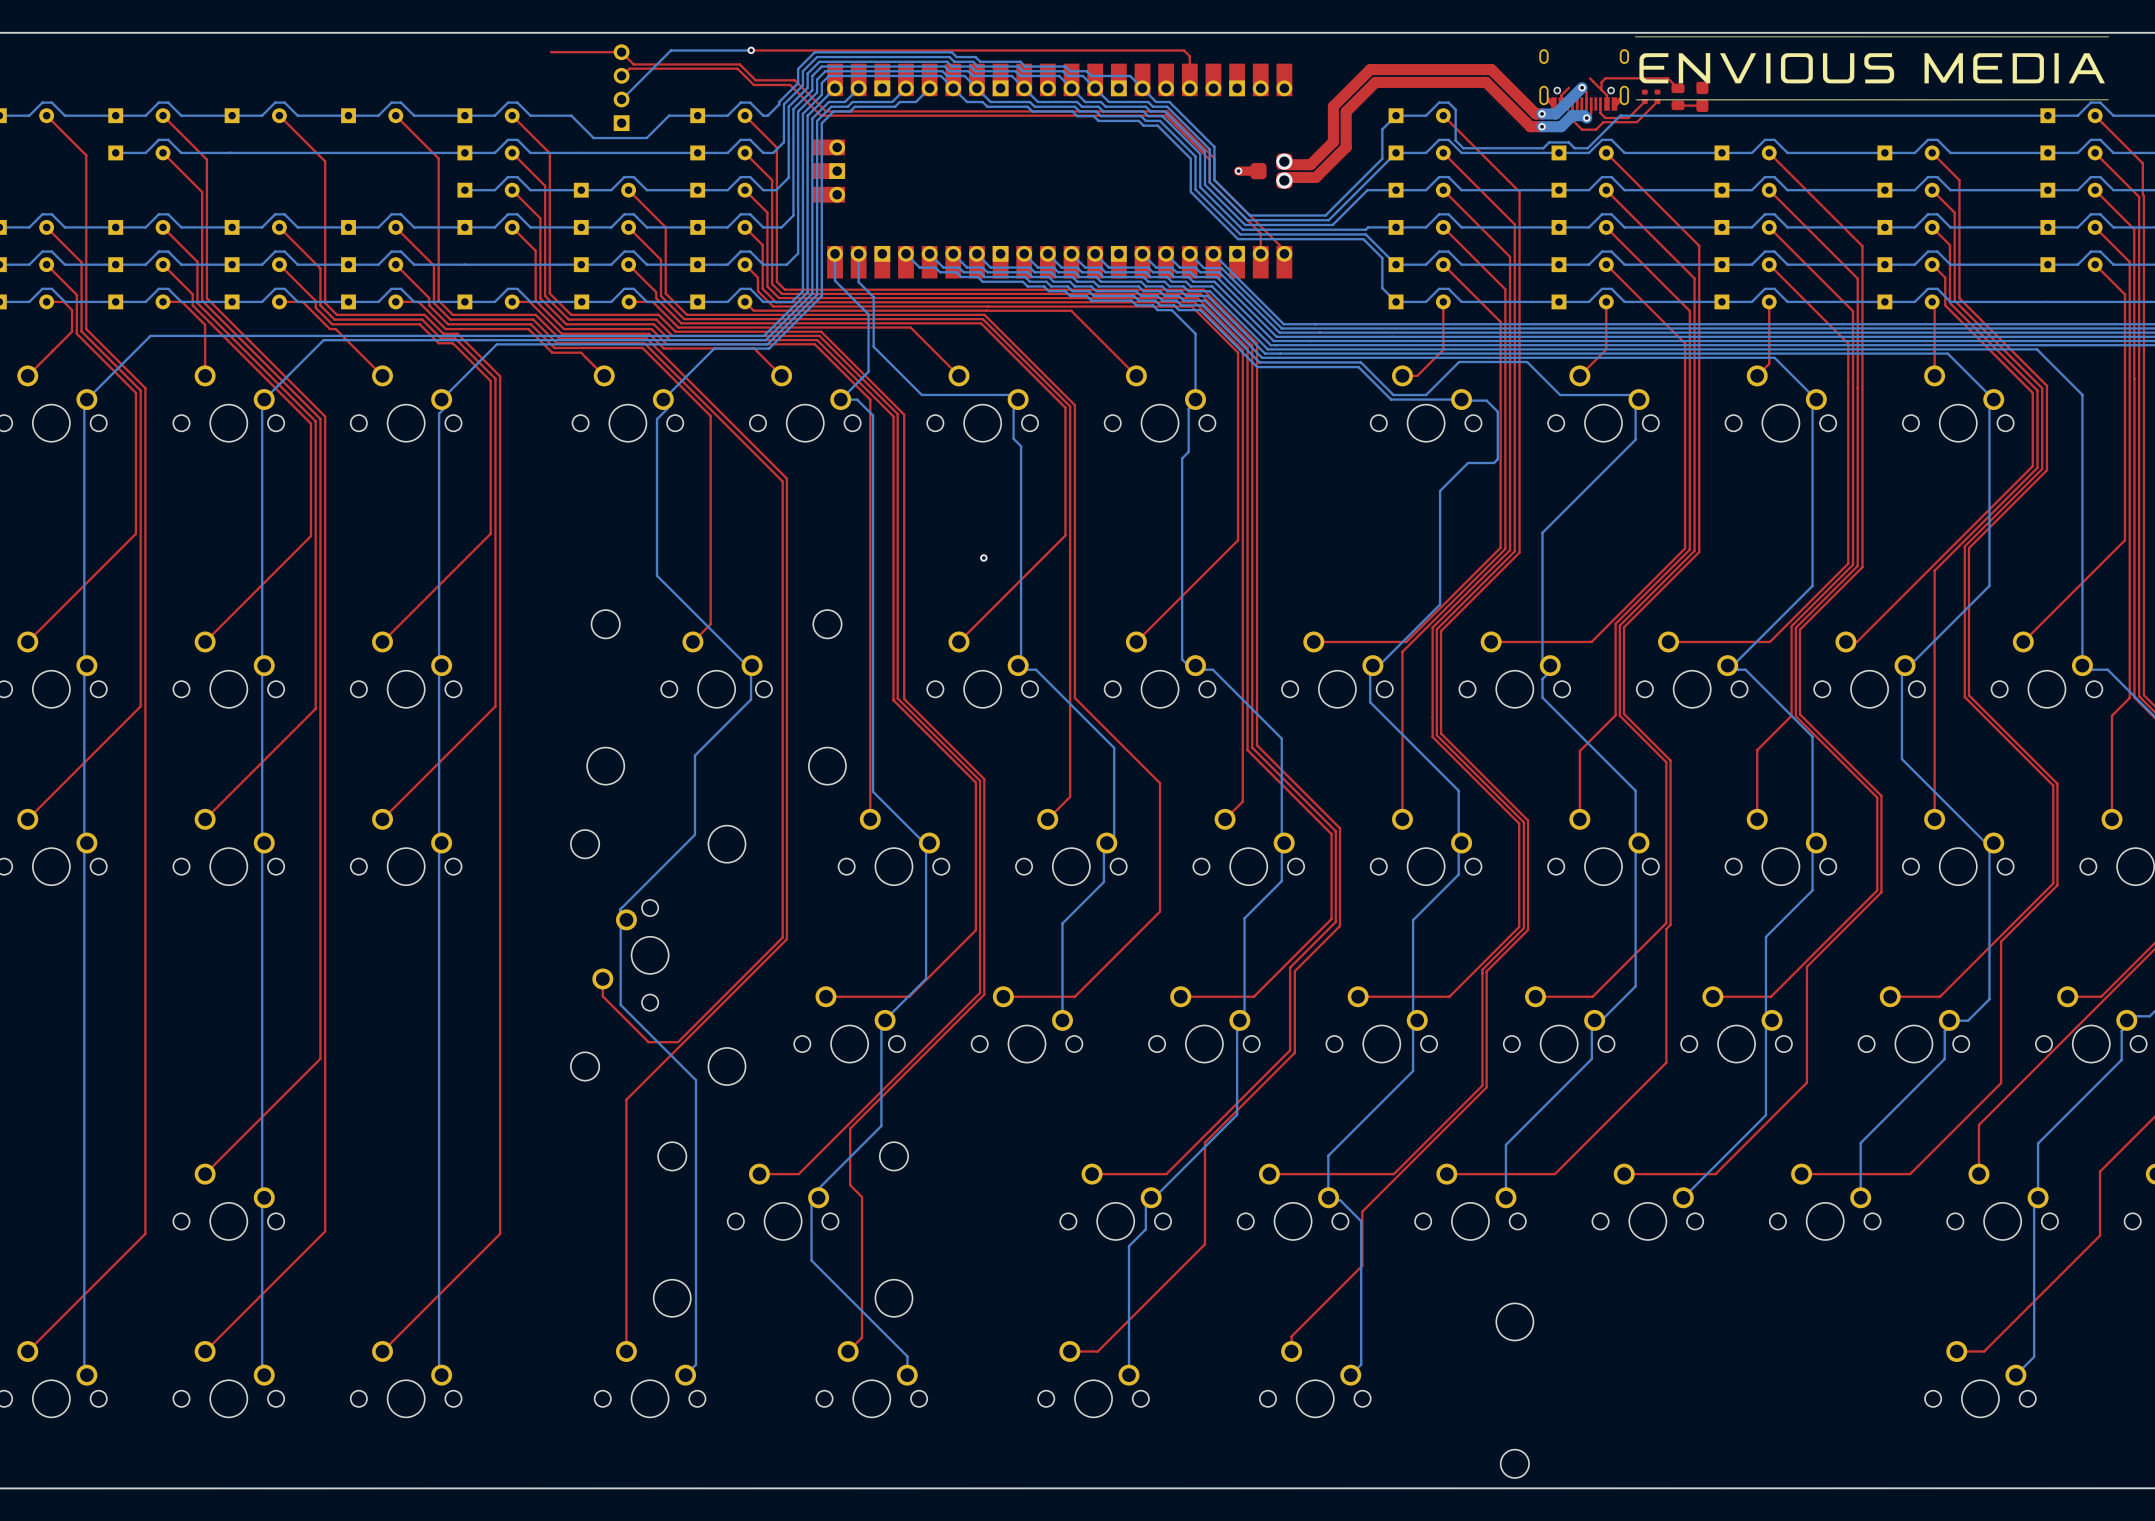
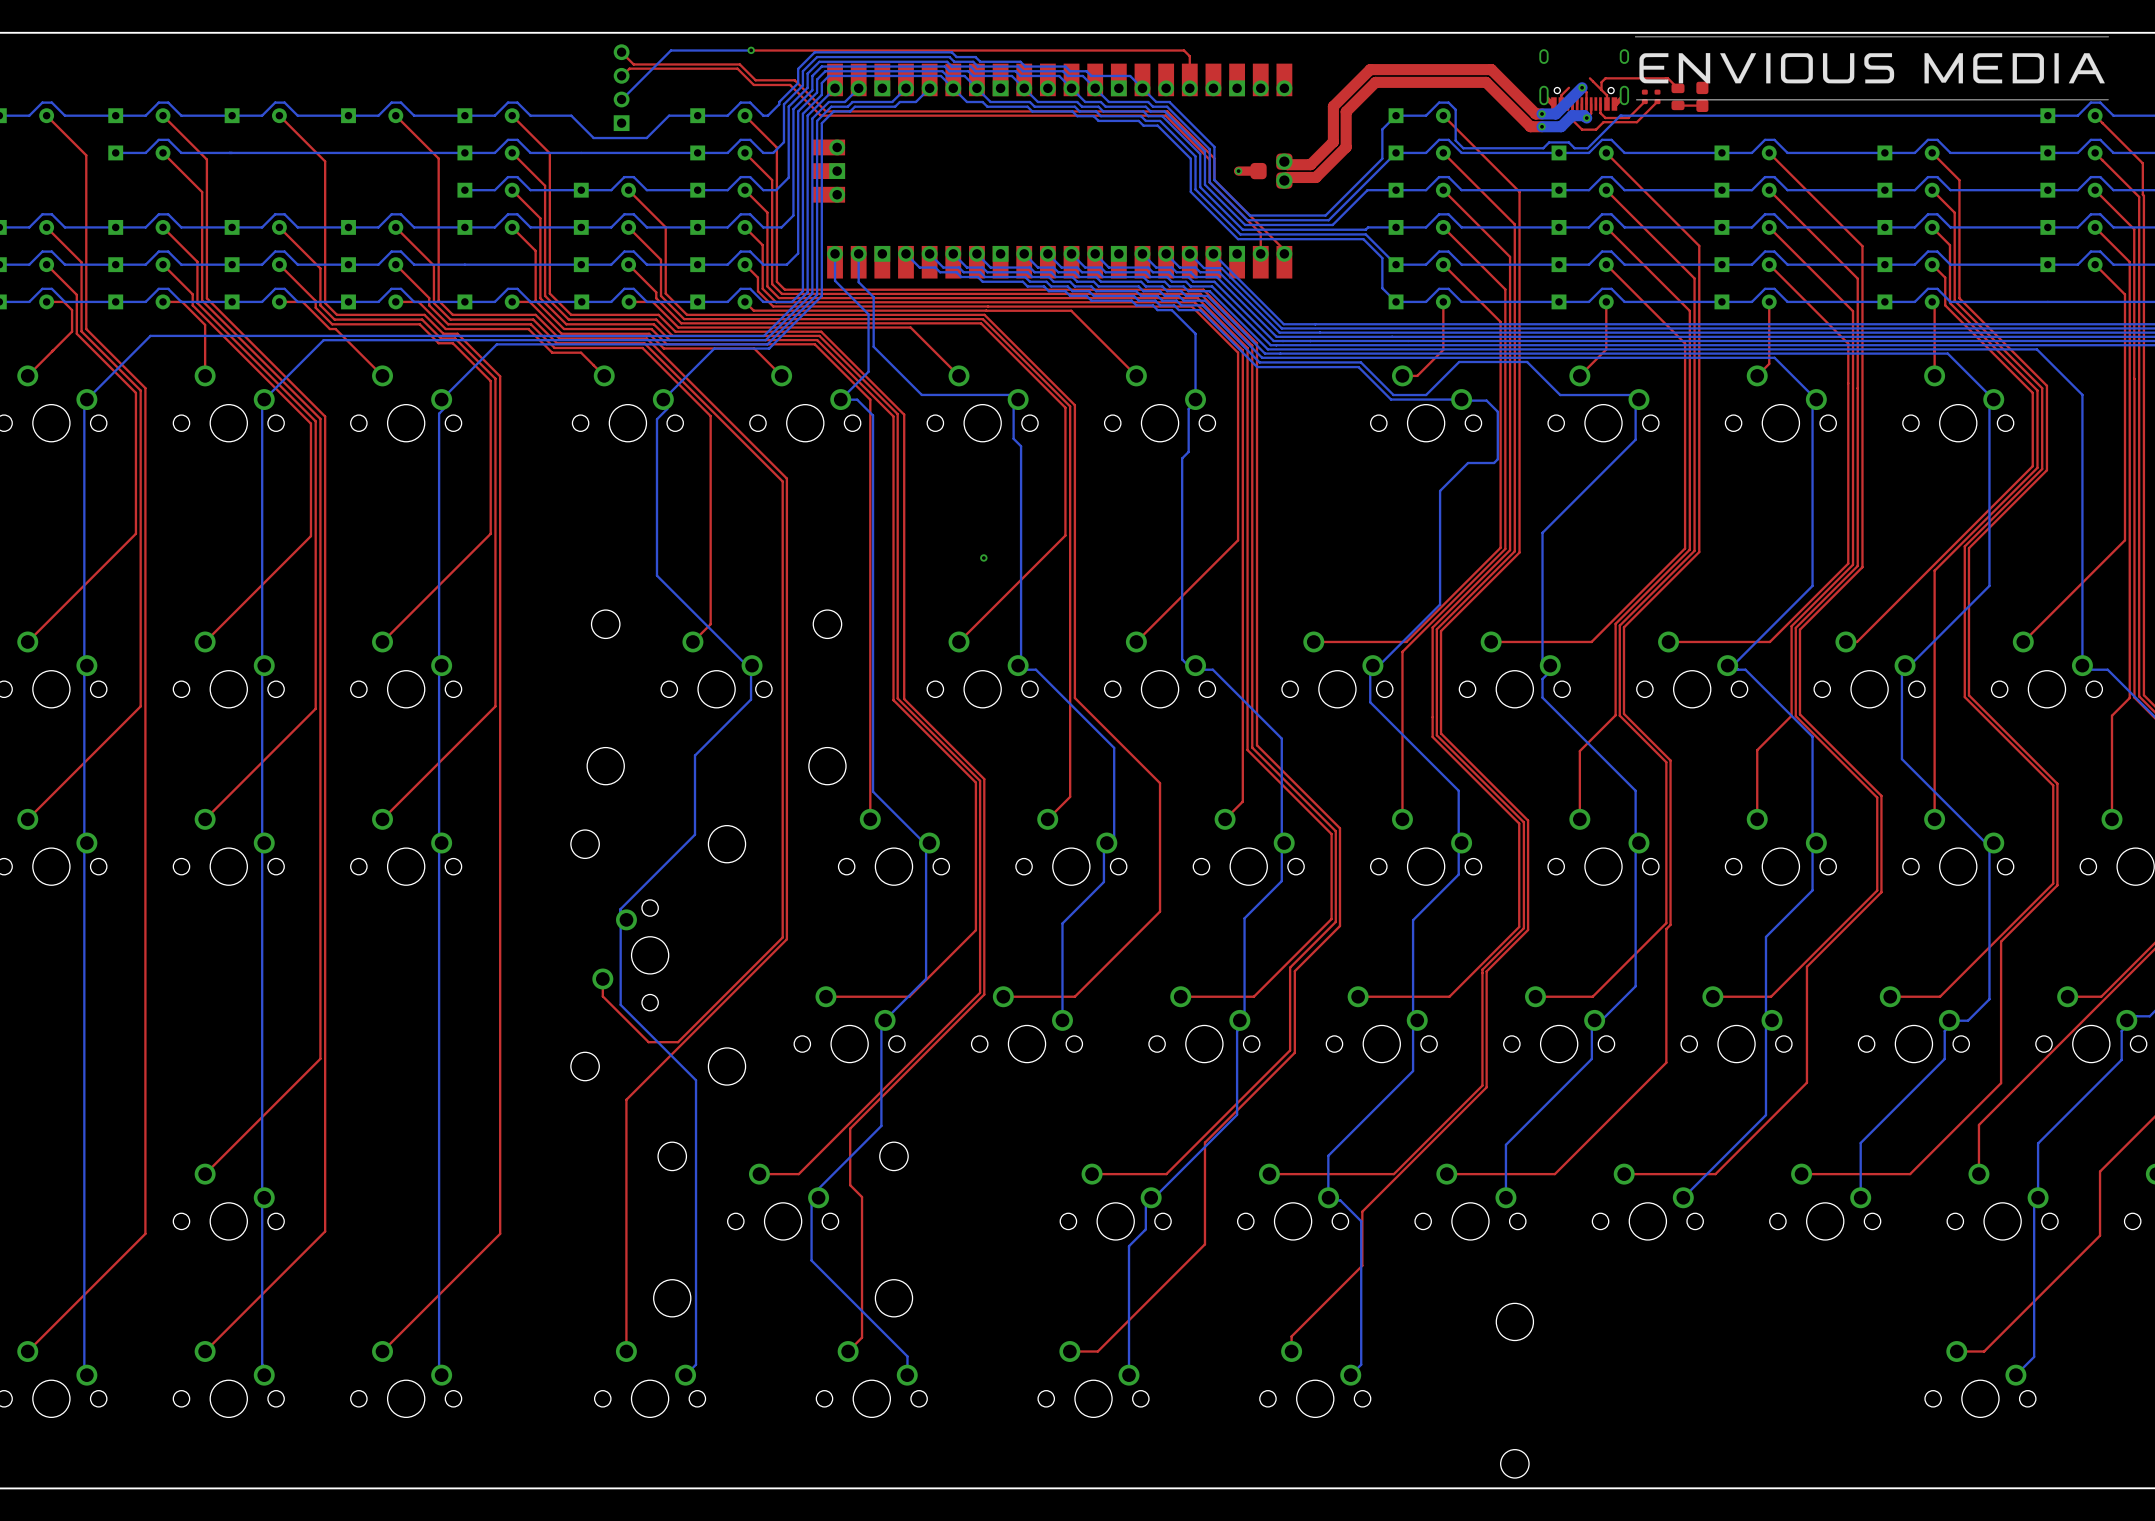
top track: (621, 52) (551, 52) -> none

